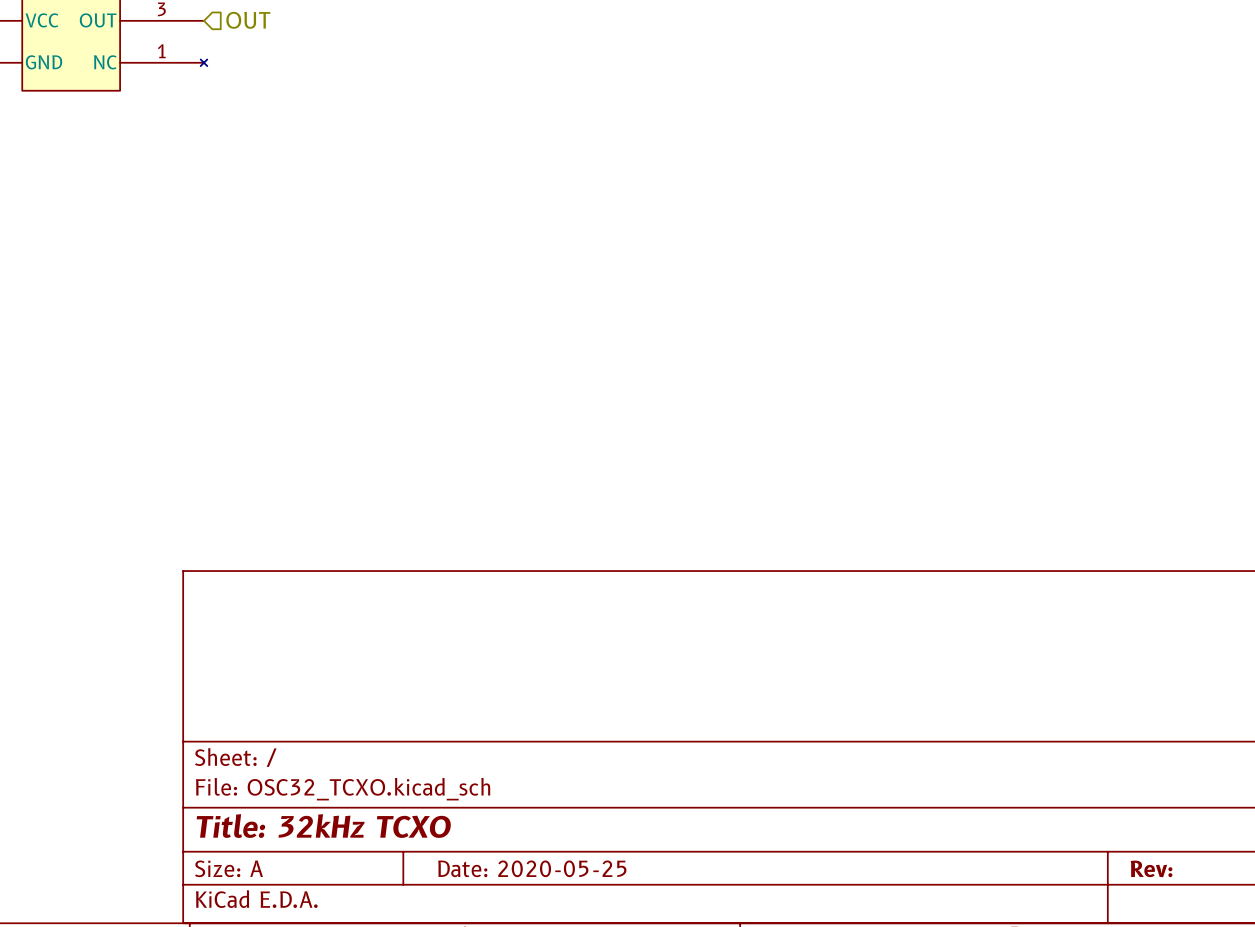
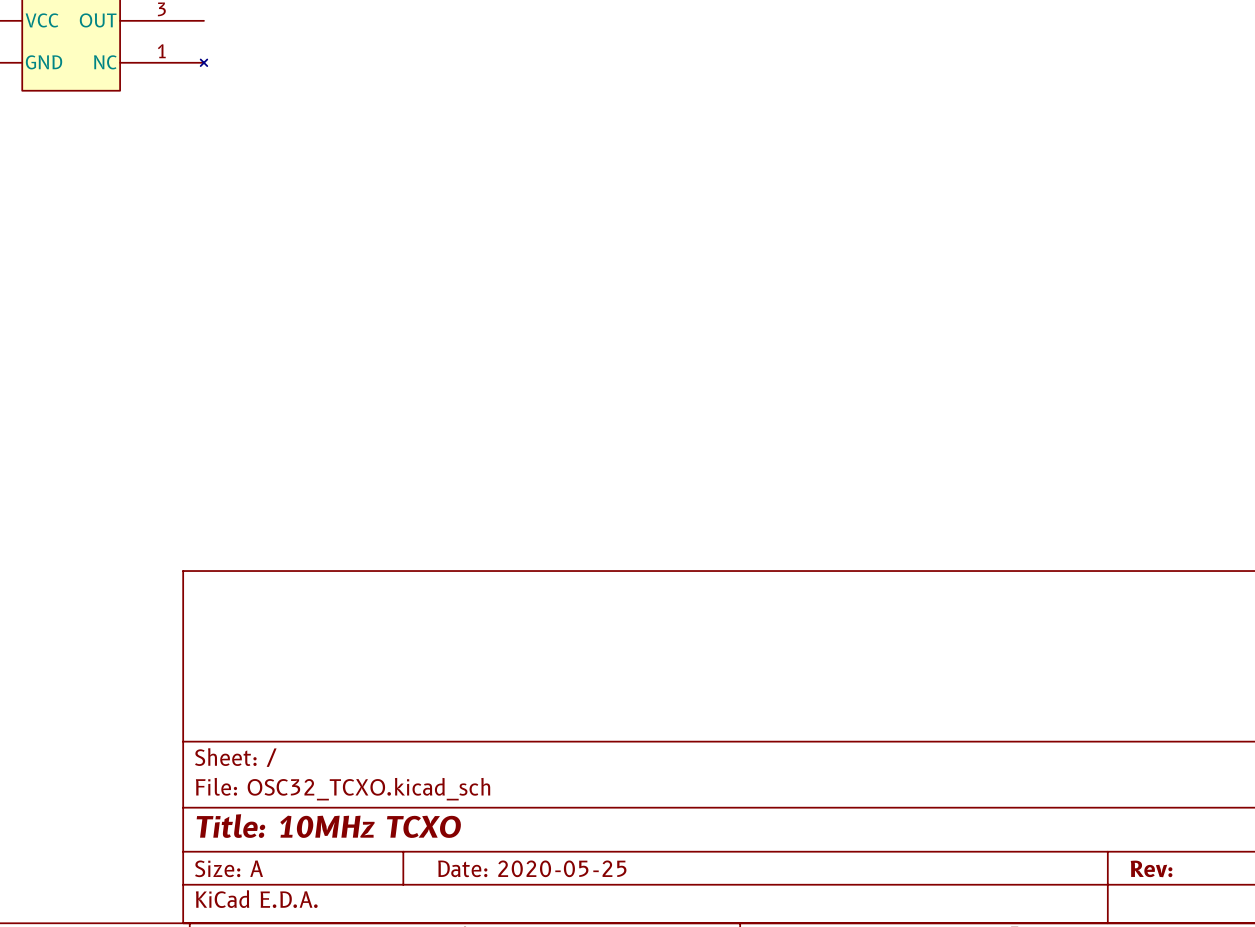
hierarchical label: OUT (248, 20) -> none
title block: Title: 32kHz TCXO (323, 826) -> Title: 10MHz TCXO (328, 826)

